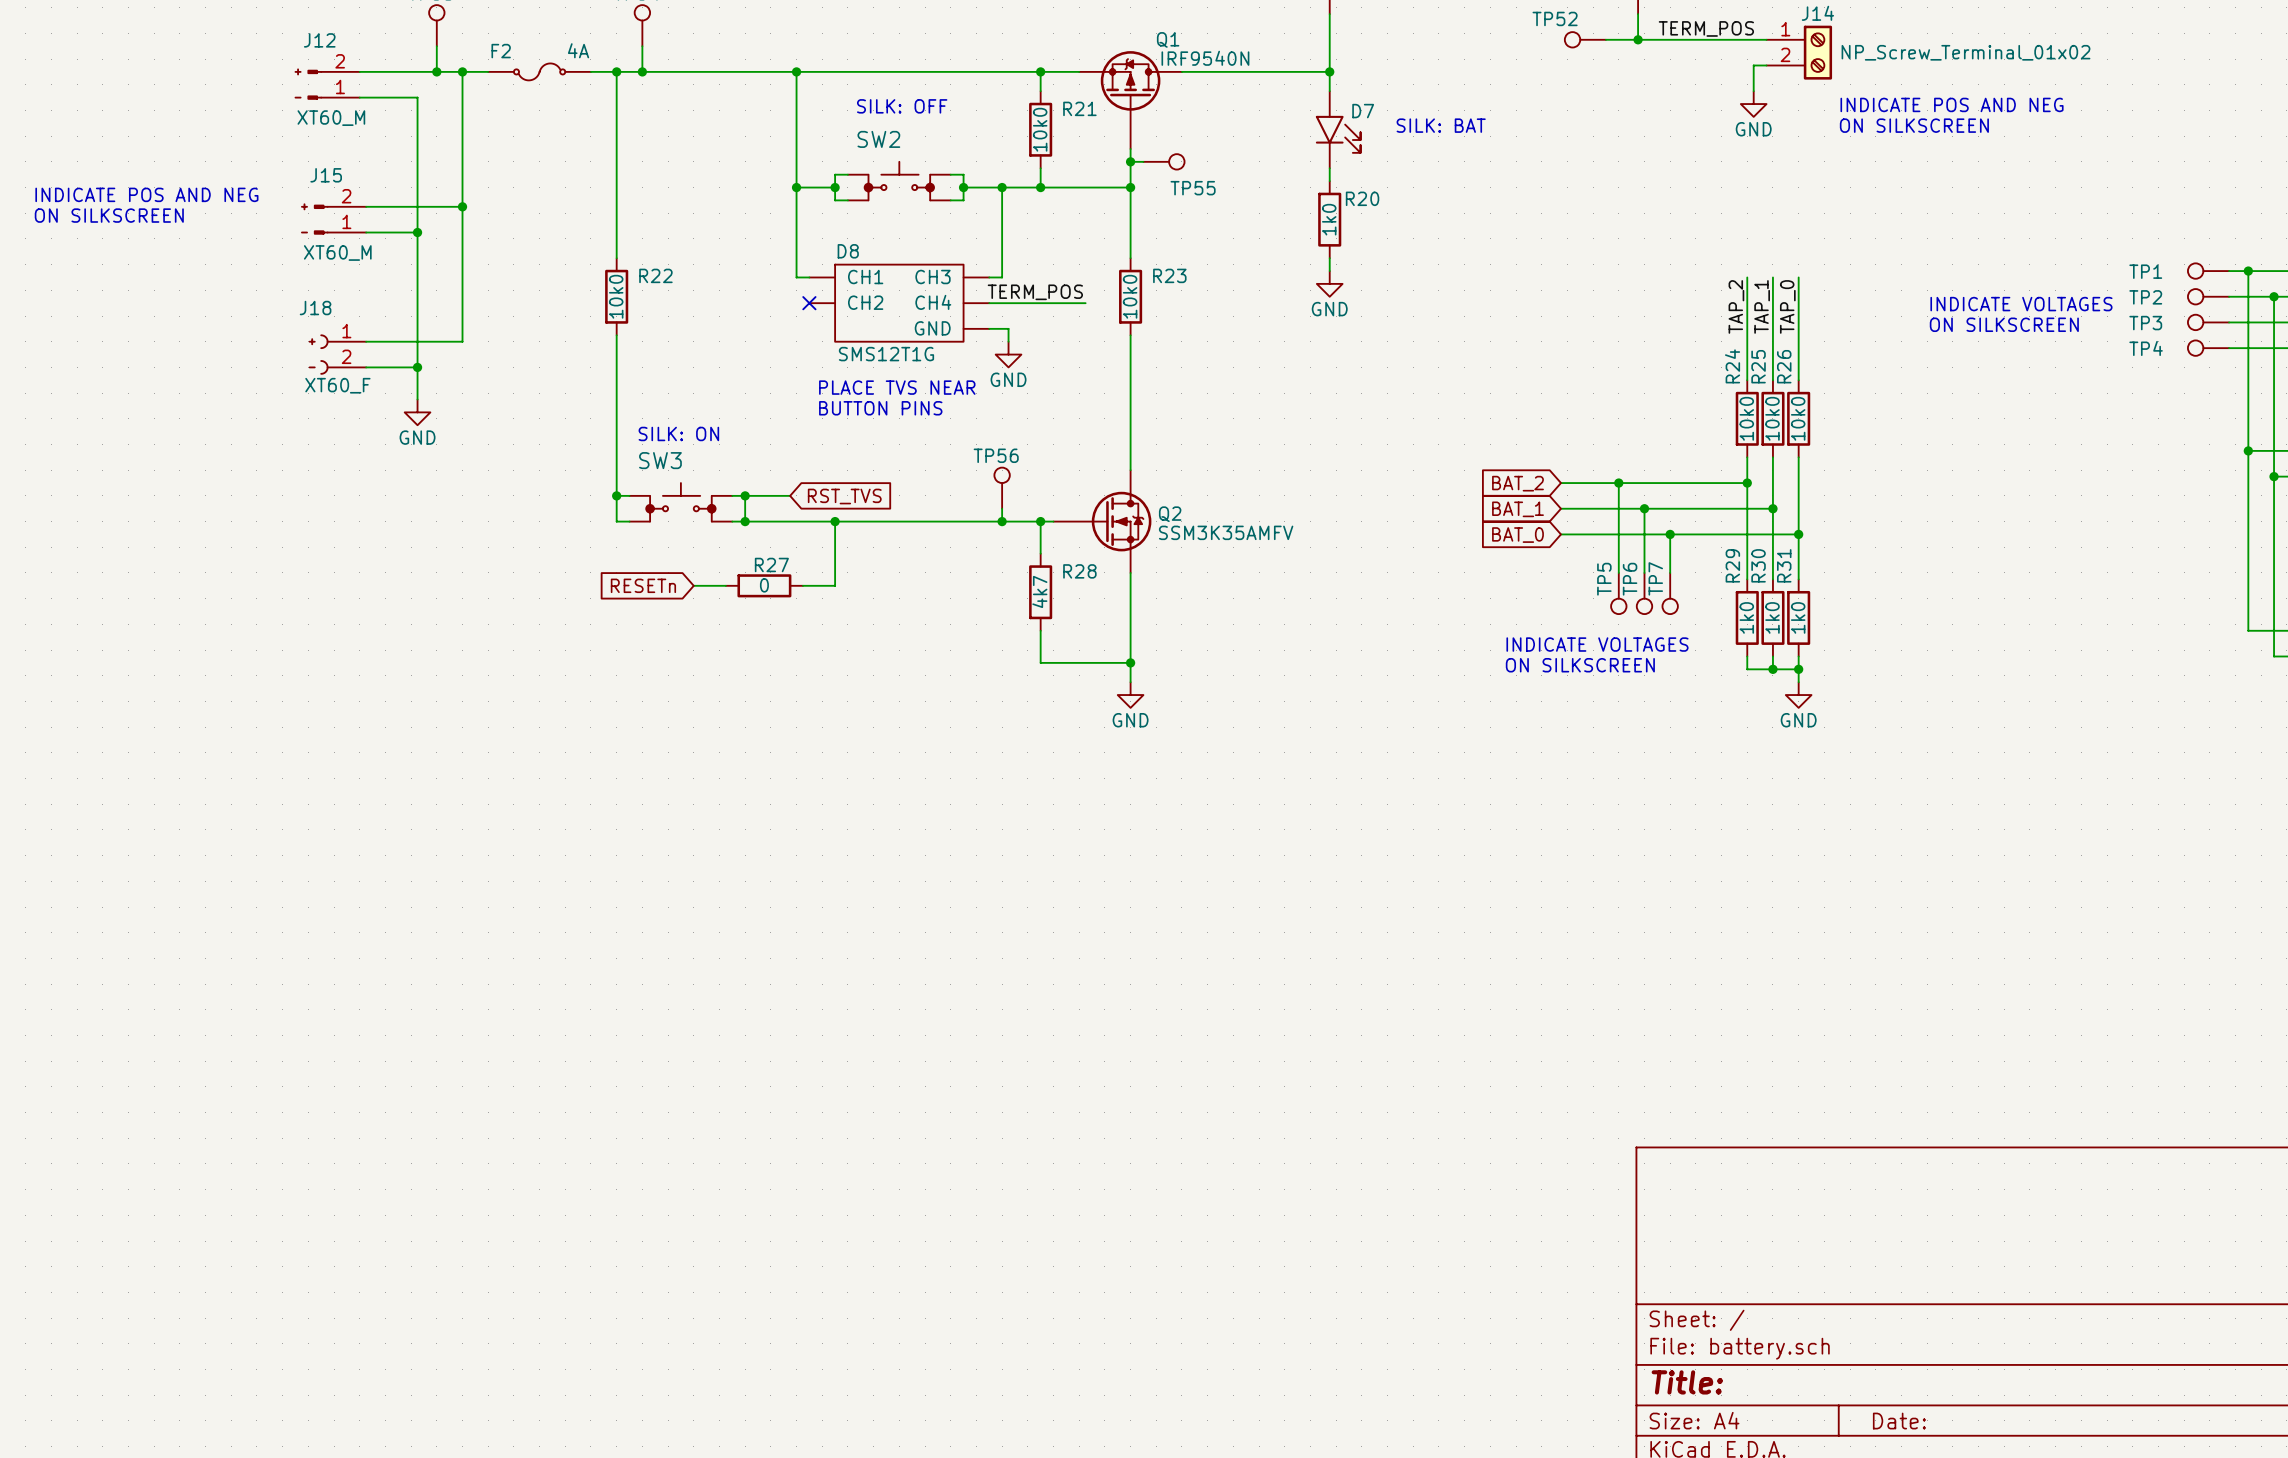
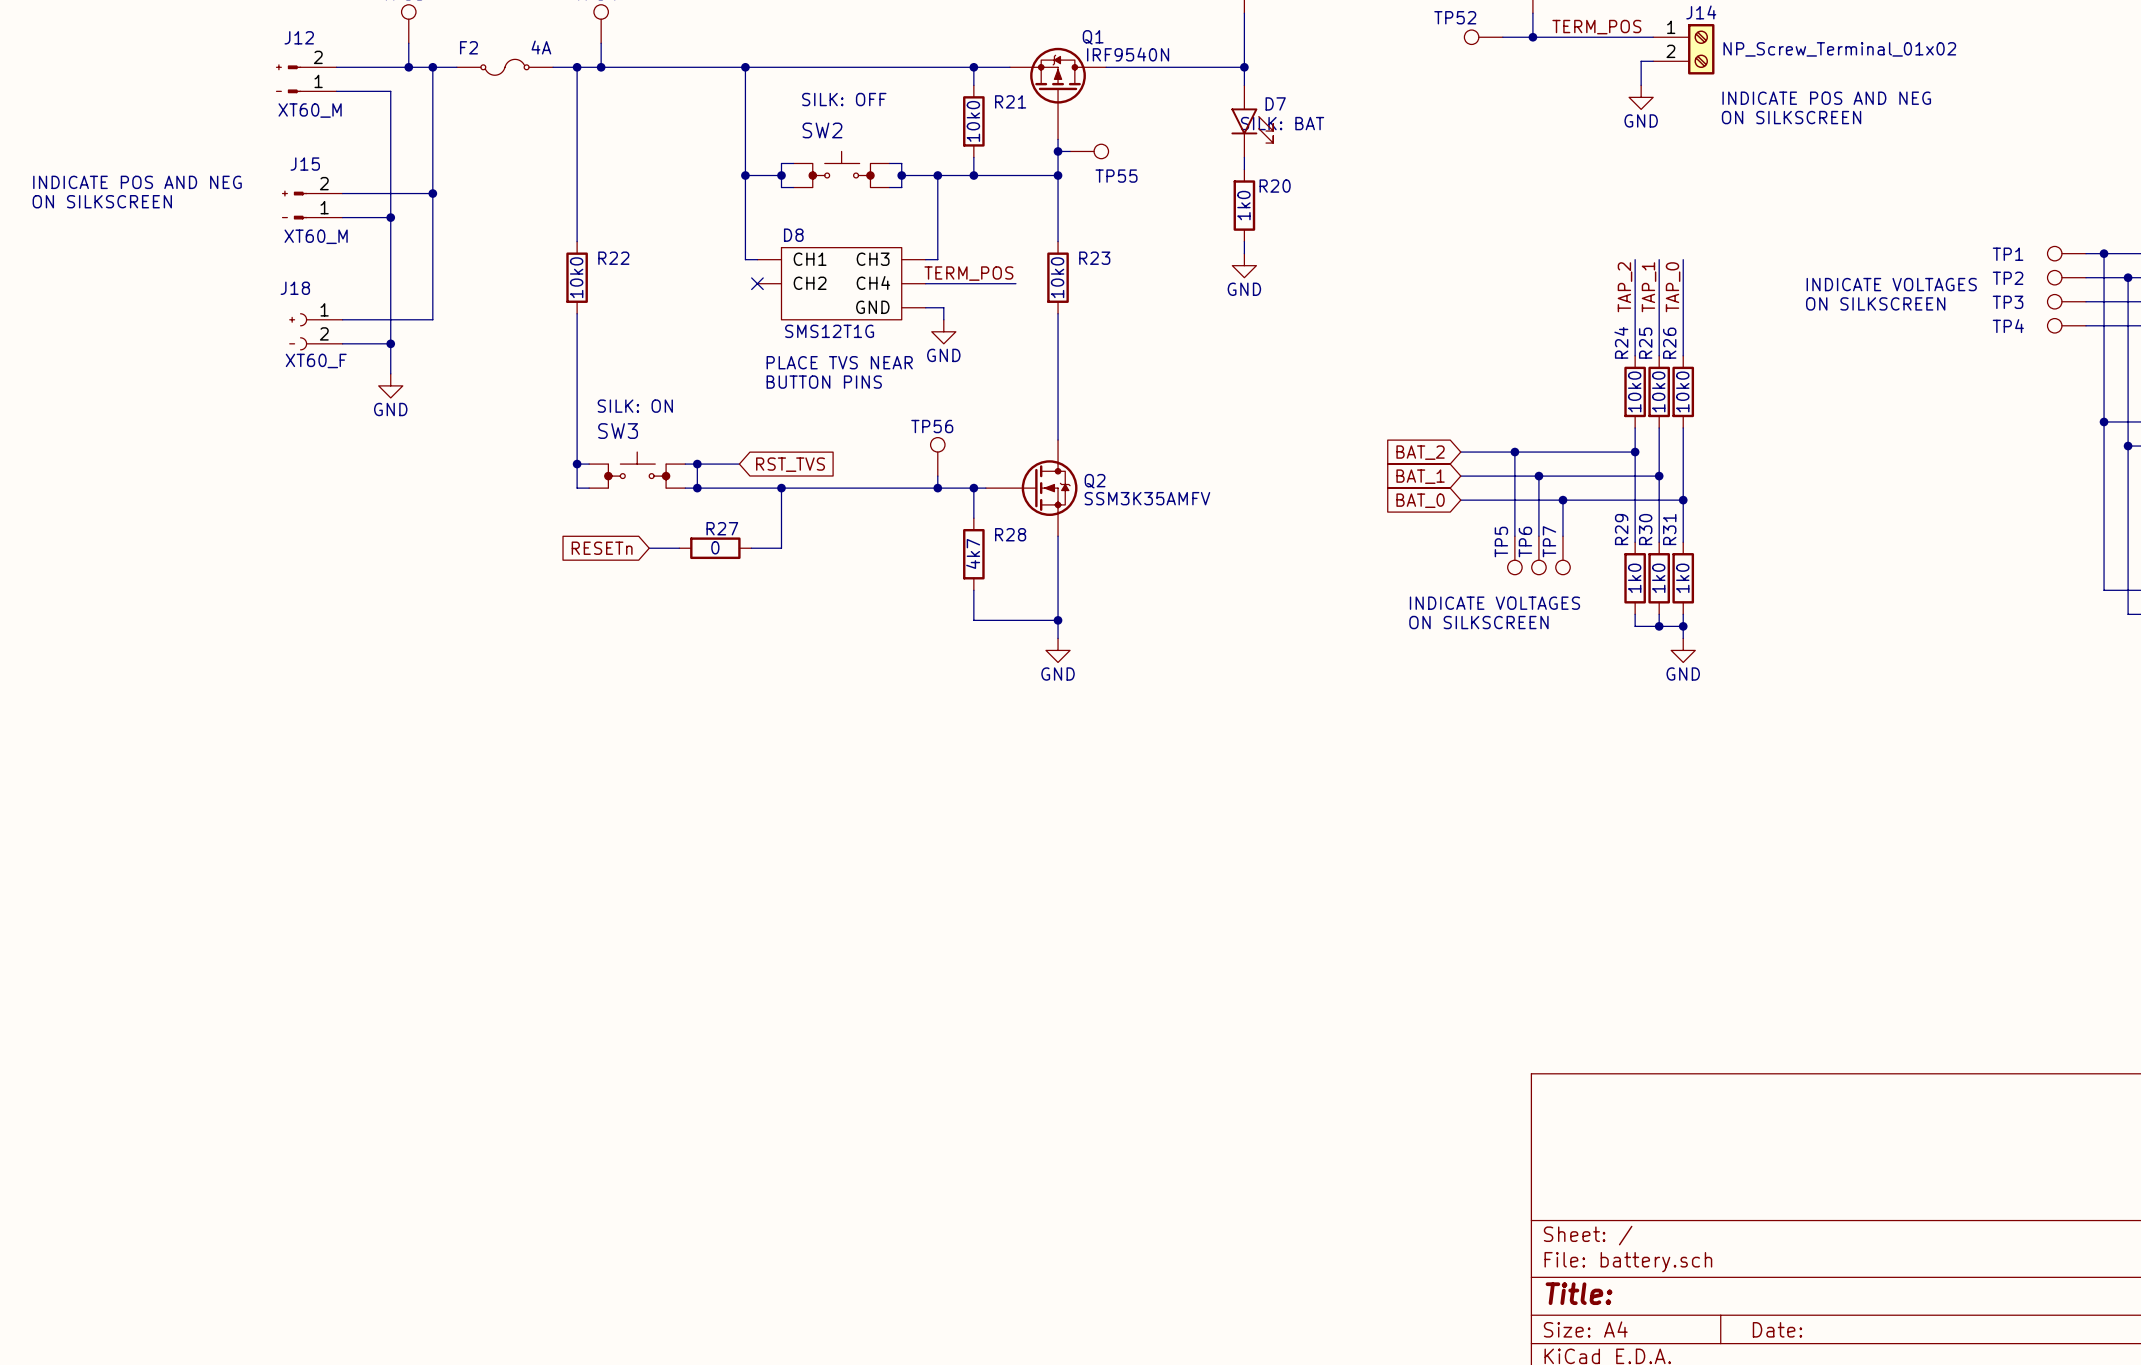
text position: SILK: BAT (1441, 125) -> SILK: BAT (1282, 123)

